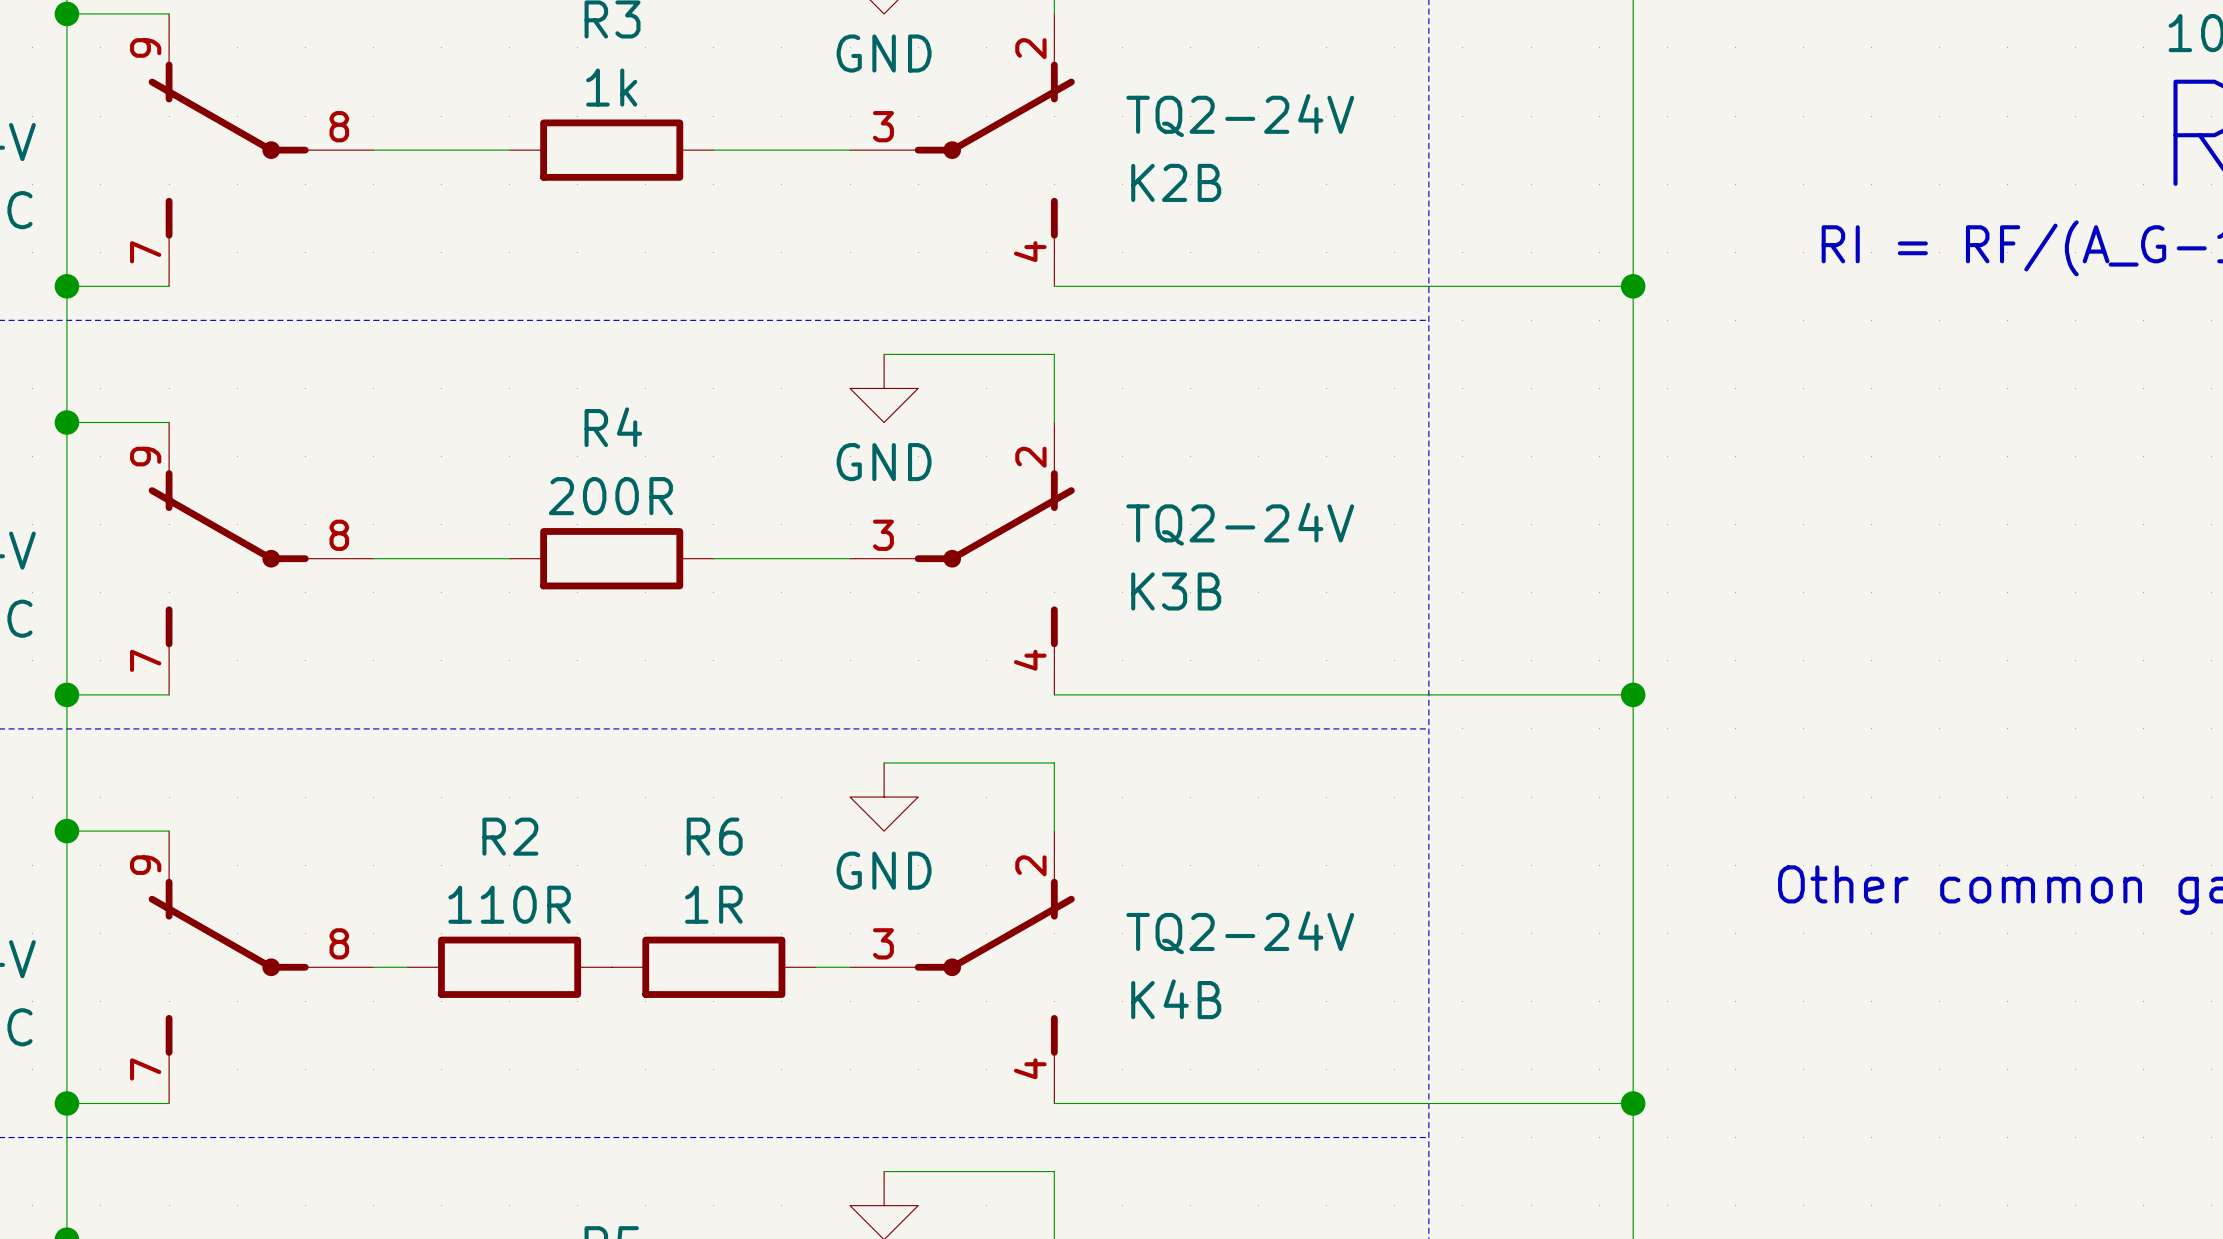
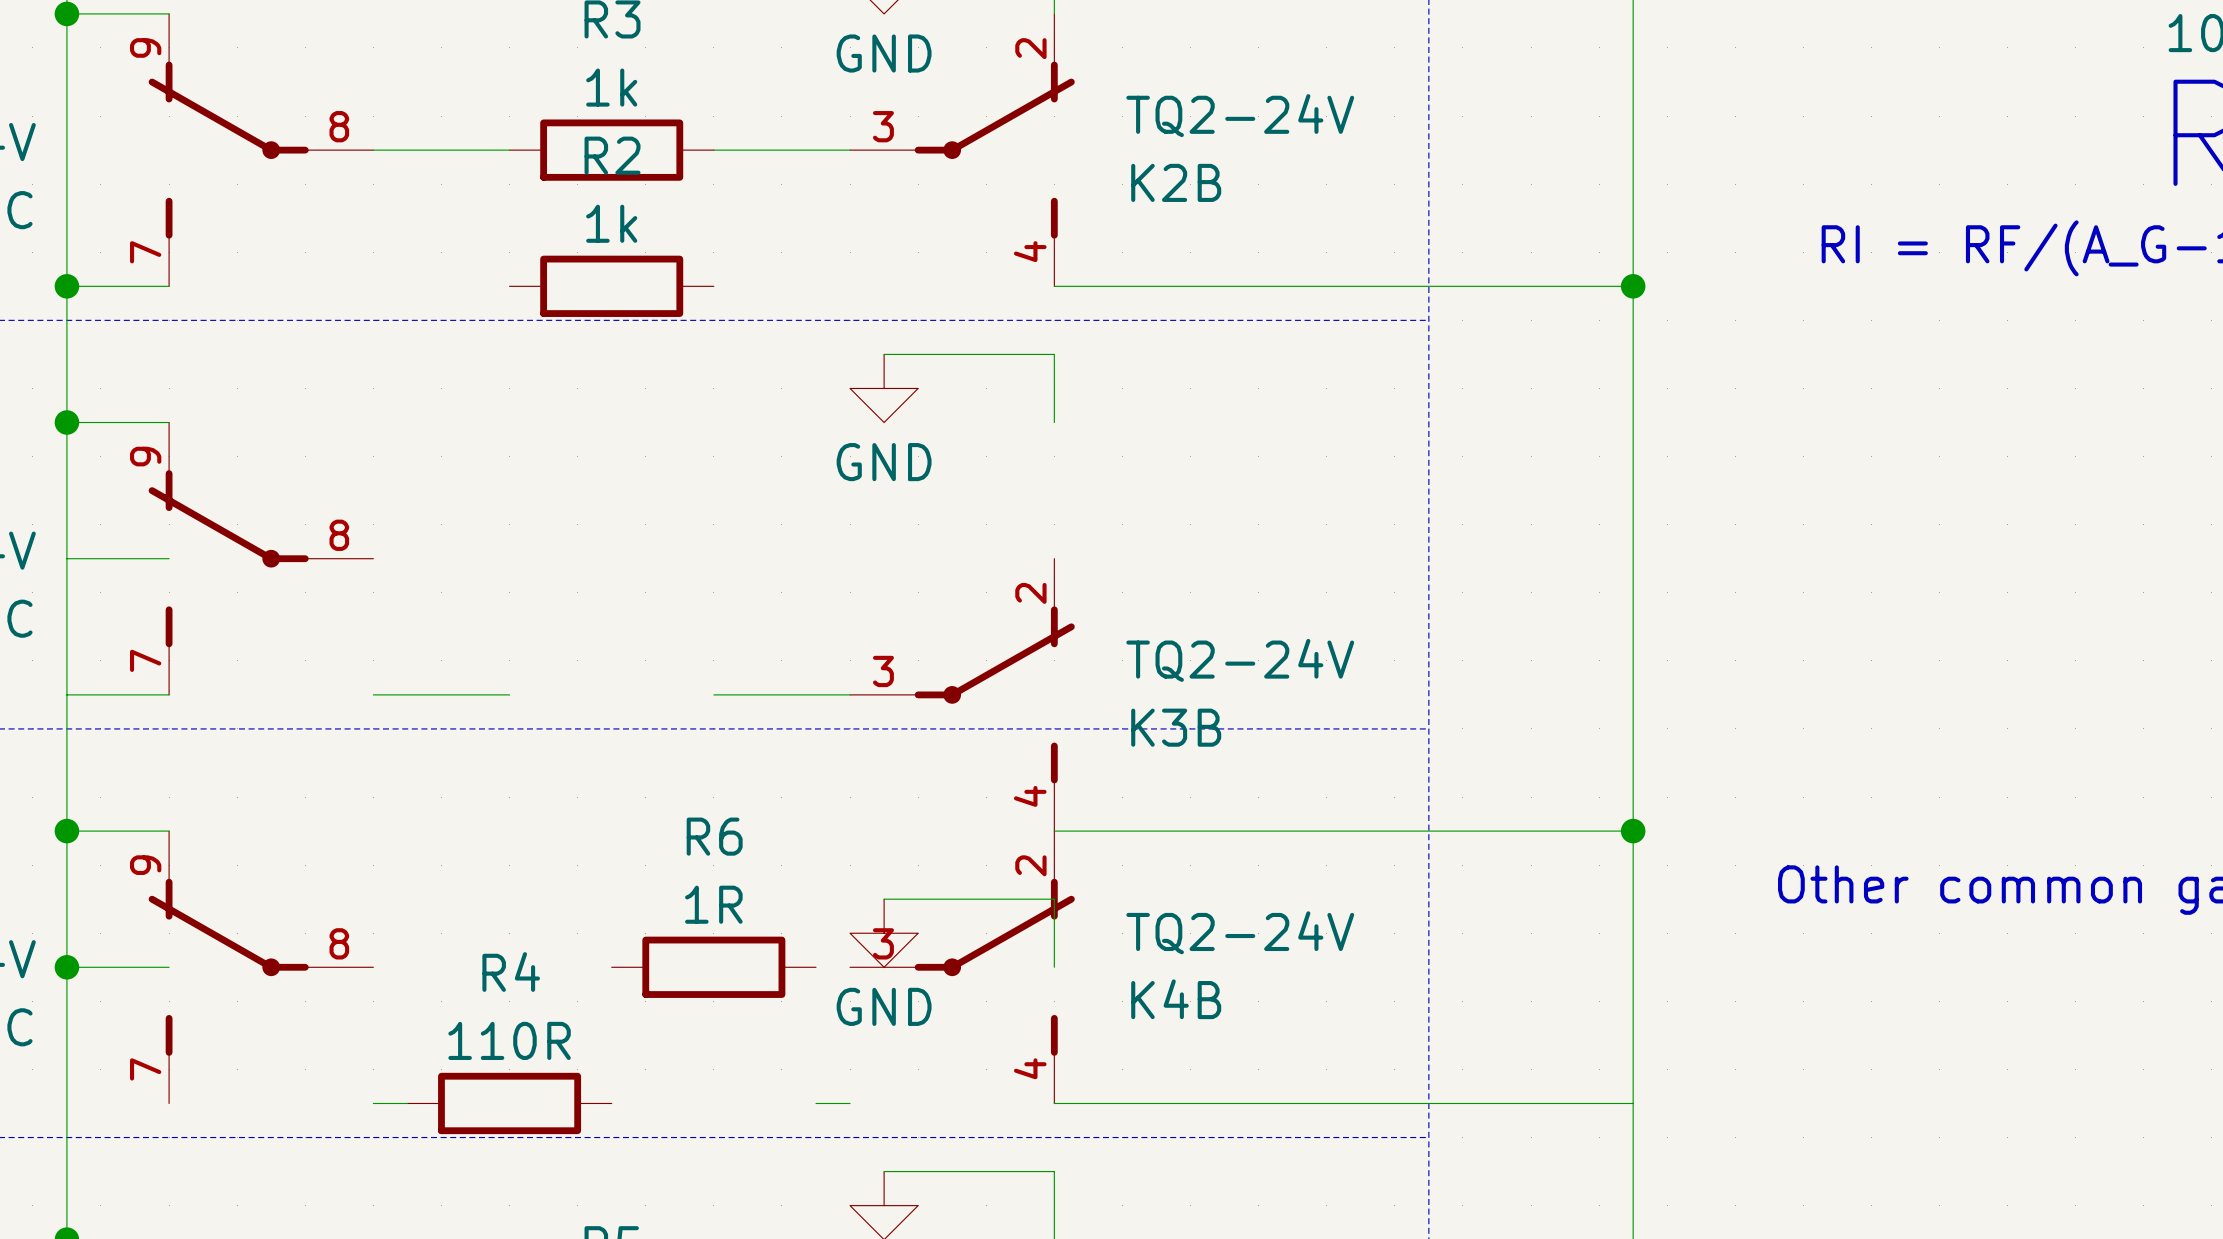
R4 value: 200R (610, 496) -> 110R (509, 1040)
wire: (373, 558) (509, 558) -> (373, 694) (509, 694)
R4 position: (611, 558) -> (509, 1103)
wire: (713, 558) (850, 558) -> (713, 694) (850, 694)
K3B position: (962, 558) -> (962, 694)
junction: (66, 694) -> none
wire: (1054, 694) (1633, 694) -> none
junction: (1633, 694) -> none
wire: (884, 762) (1054, 762) (1054, 831) -> (1633, 831) (1054, 831)
power symbol position: GND (884, 797) -> GND (884, 933)
junction: none -> (1633, 831)
wire: none -> (884, 899) (1054, 899) (1054, 967)
R2 value: 110R (509, 904) -> 1k (611, 223)
wire: none -> (66, 967) (169, 967)
junction: none -> (66, 967)
wire: (373, 967) (407, 967) -> (373, 1103) (407, 1103)
R2 position: (509, 967) -> (611, 286)
wire: (816, 967) (850, 967) -> (816, 1103) (850, 1103)
wire: (66, 1103) (169, 1103) -> (66, 558) (169, 558)
junction: (66, 1103) -> none
junction: (1633, 1103) -> none

